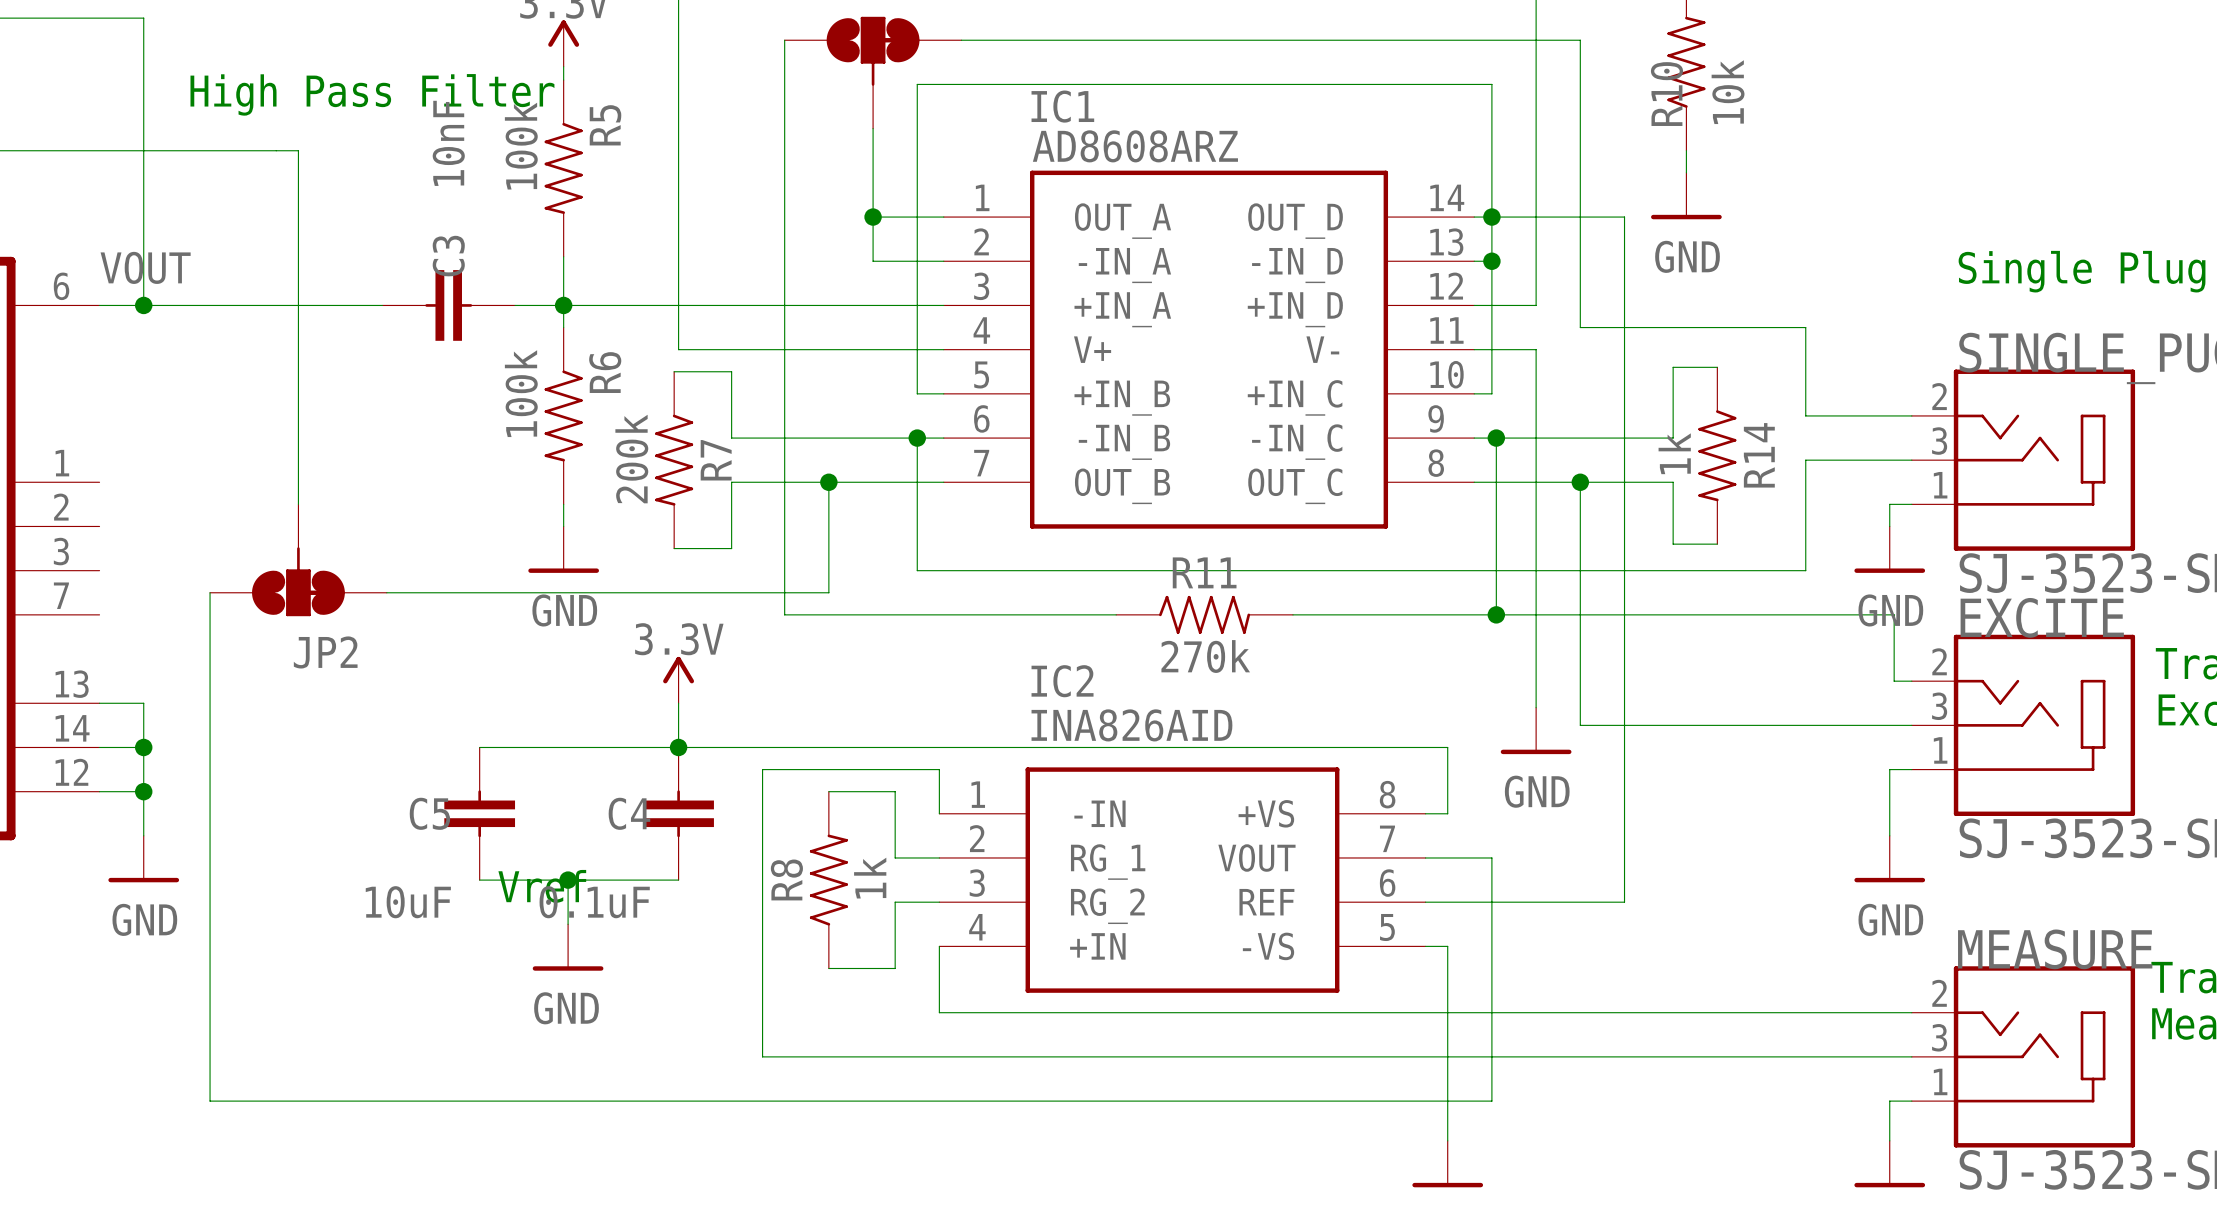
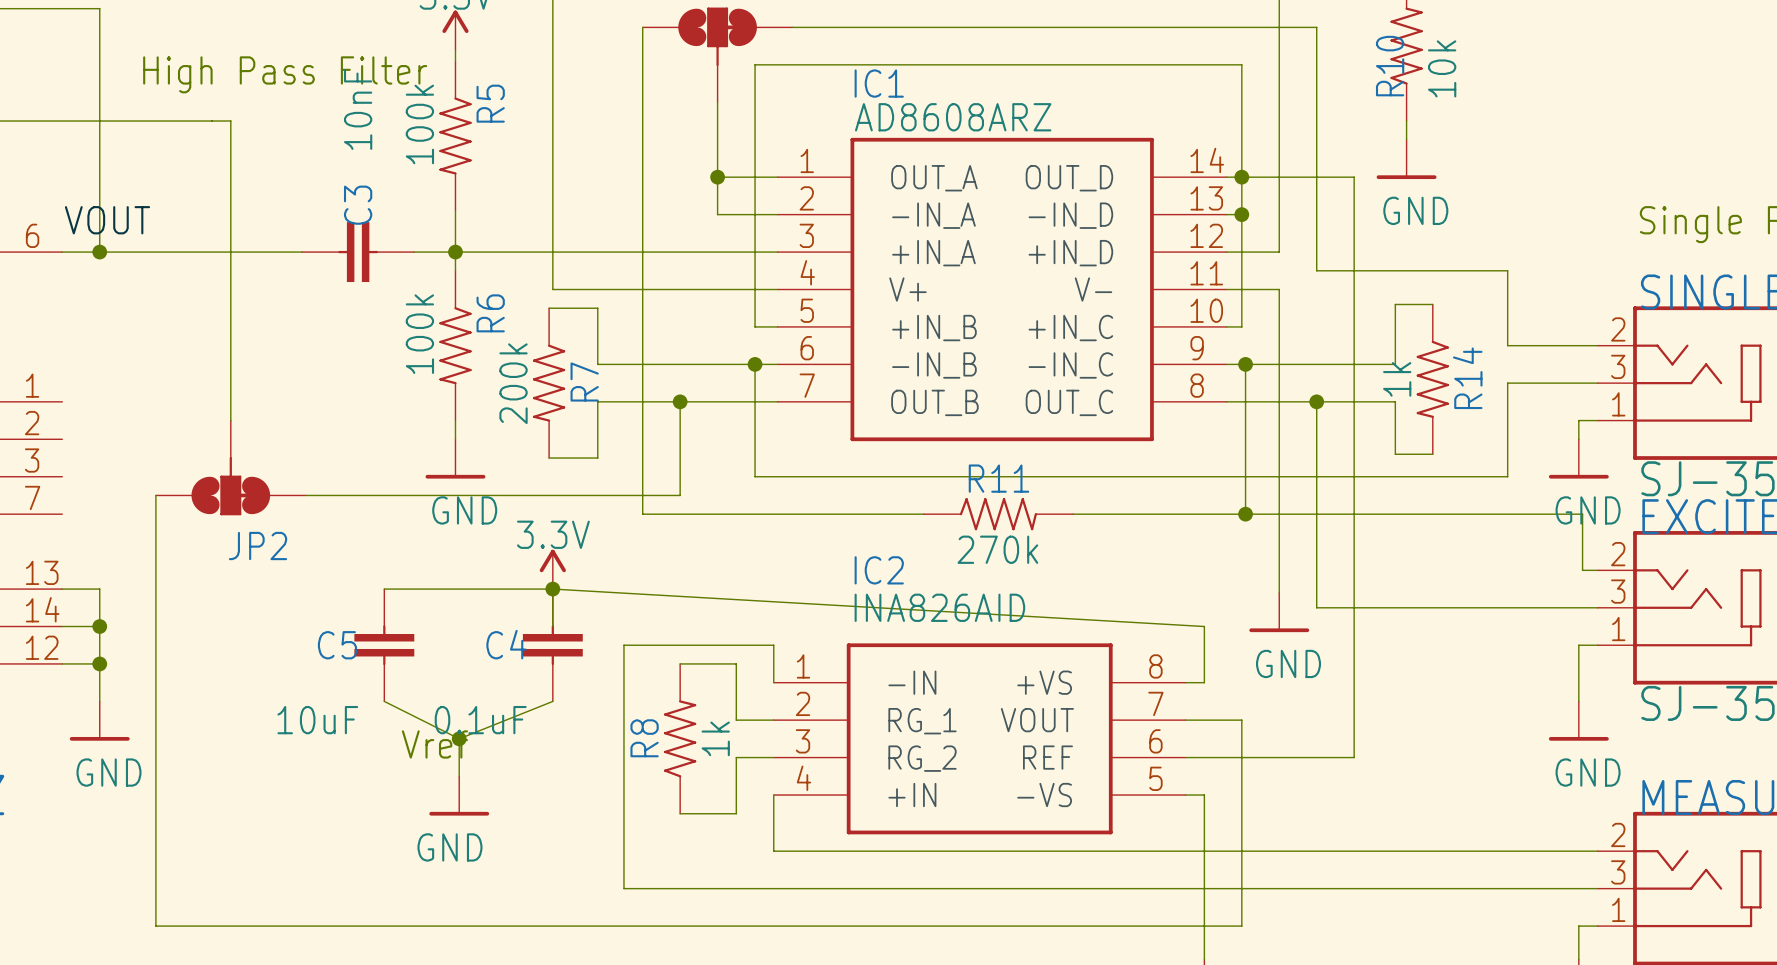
wire: (479, 747) (1447, 747) -> (384, 589) (552, 589) (1204, 626)
junction position: (678, 747) -> (552, 589)
C5 position: (479, 813) -> (384, 645)
C4 position: (678, 813) -> (552, 645)
wire: none -> (384, 701) (459, 738) (552, 701)
wire: (479, 880) (678, 880) -> none

